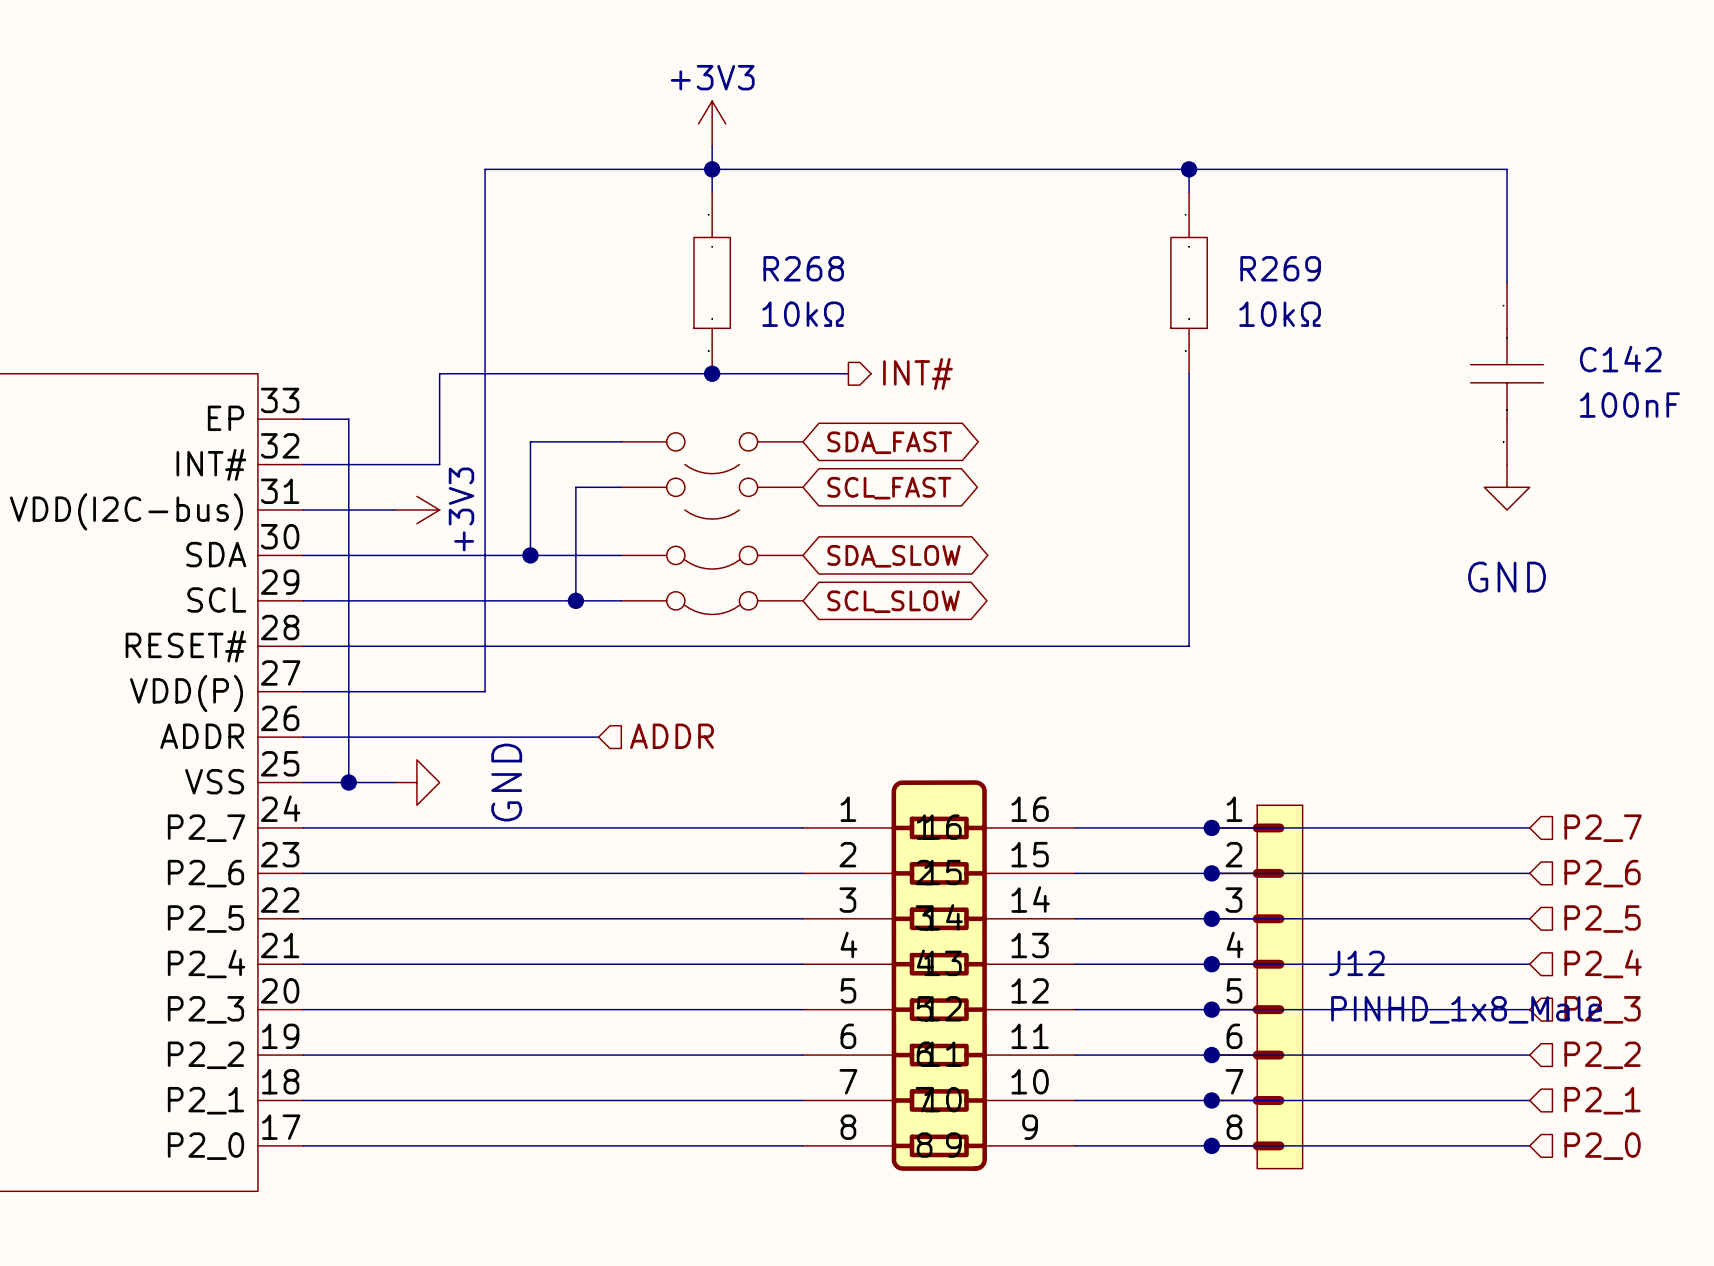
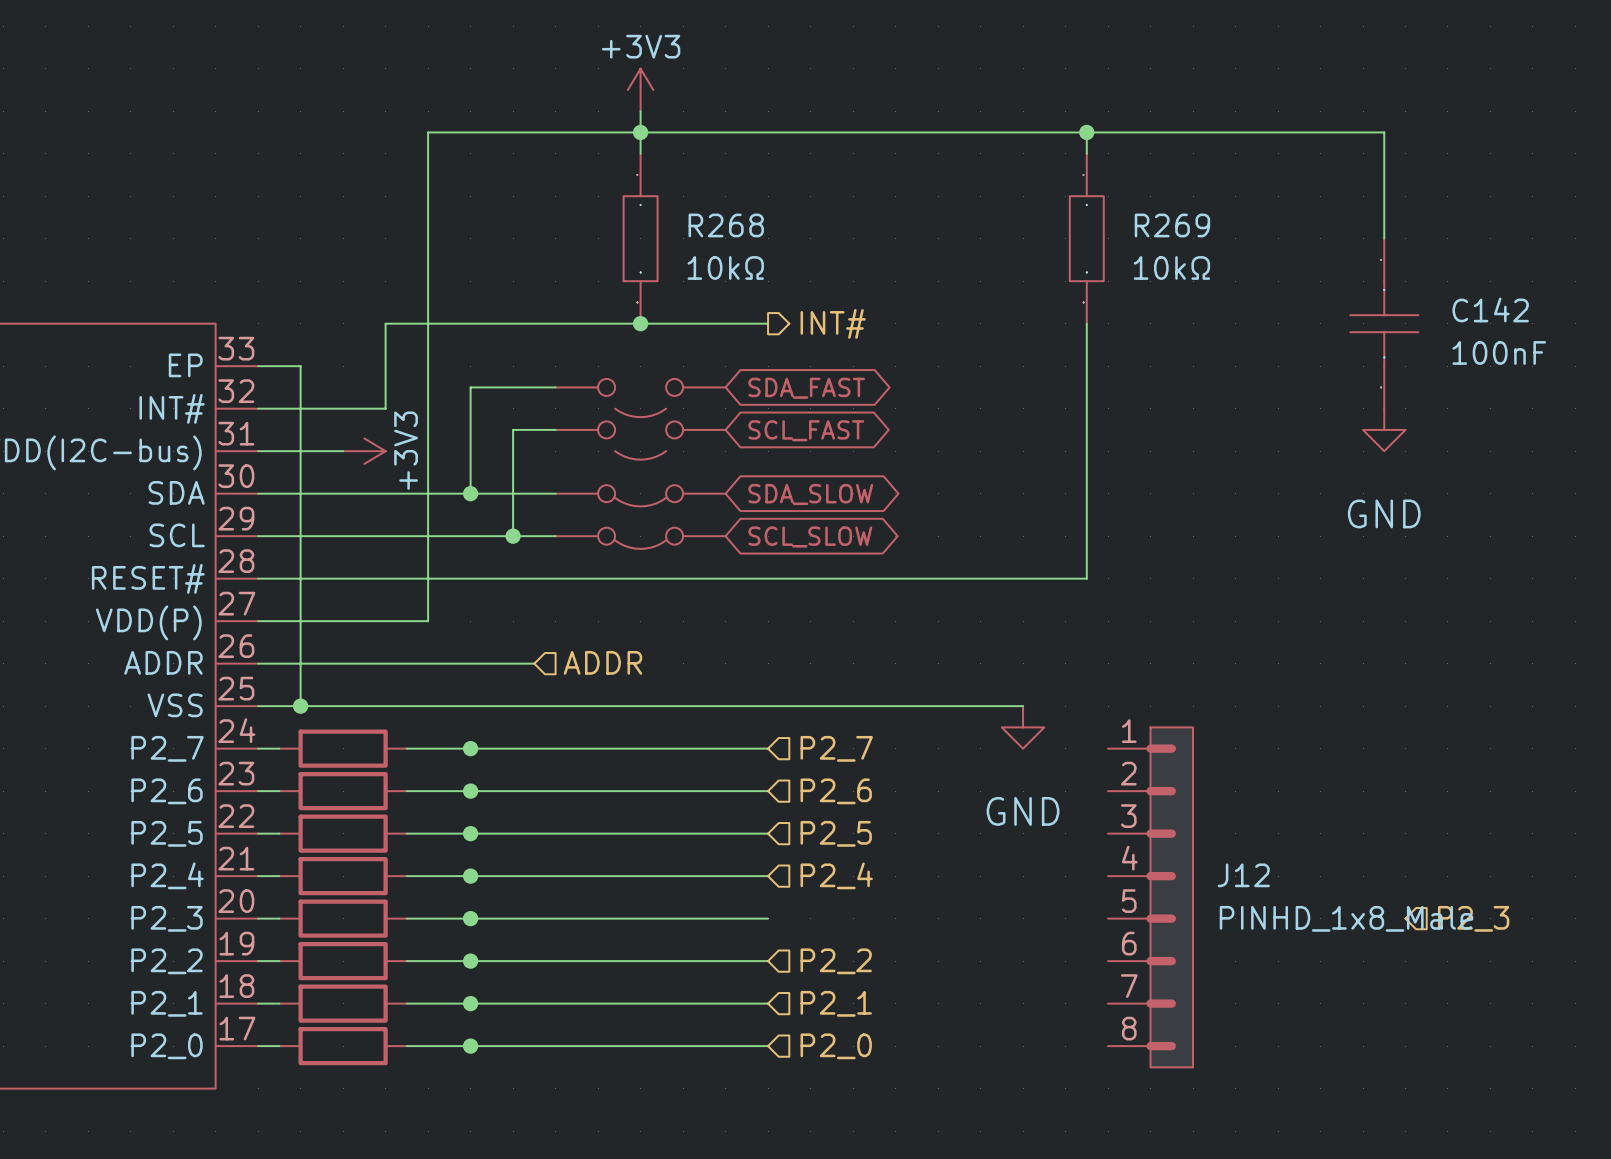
wire: none -> (343, 706) (1023, 706)
power symbol: GND (416, 782) -> none
power symbol: none -> GND (1023, 727)
wire: (326, 827) (462, 827) -> none
part: none -> (343, 748)
junction: none -> (470, 748)
wire: (1075, 827) (1529, 827) -> none
junction: (1211, 827) -> none
hierarchical label: none -> P2_7 (836, 748)
hierarchical label: P2_7 (1603, 828) -> none
wire: (326, 873) (462, 873) -> none
part: none -> (343, 791)
junction: none -> (470, 791)
hierarchical label: none -> P2_6 (836, 791)
wire: (1075, 873) (1529, 873) -> none
junction: (1211, 873) -> none
hierarchical label: P2_6 (1602, 873) -> none
wire: (326, 918) (462, 918) -> none
part: none -> (343, 833)
junction: none -> (470, 833)
wire: (1075, 918) (1529, 918) -> none
junction: (1211, 918) -> none
hierarchical label: none -> P2_5 (836, 833)
hierarchical label: P2_5 (1602, 919) -> none
hierarchical label: none -> P2_4 (836, 875)
hierarchical label: P2_4 (1603, 963) -> none
wire: (326, 964) (462, 964) -> none
part: none -> (343, 876)
junction: none -> (470, 876)
wire: (1075, 964) (1529, 964) -> none
junction: (1211, 964) -> none
part: (939, 975) -> none
wire: (326, 1009) (462, 1009) -> none
part: none -> (343, 918)
junction: none -> (470, 918)
wire: (1075, 1009) (1529, 1009) -> none
junction: (1211, 1009) -> none
wire: (326, 1055) (462, 1055) -> none
part: none -> (343, 961)
junction: none -> (470, 961)
hierarchical label: none -> P2_2 (836, 961)
wire: (1075, 1055) (1529, 1055) -> none
junction: (1211, 1055) -> none
hierarchical label: P2_2 (1602, 1055) -> none
wire: (326, 1100) (462, 1100) -> none
part: none -> (343, 1003)
junction: none -> (470, 1003)
hierarchical label: none -> P2_1 (836, 1003)
wire: (1075, 1100) (1529, 1100) -> none
junction: (1211, 1100) -> none
hierarchical label: P2_1 (1602, 1100) -> none
wire: (326, 1145) (462, 1145) -> none
part: none -> (343, 1046)
junction: none -> (470, 1046)
wire: (1075, 1145) (1529, 1145) -> none
junction: (1211, 1145) -> none
hierarchical label: none -> P2_0 (836, 1046)
hierarchical label: P2_0 (1602, 1146) -> none

